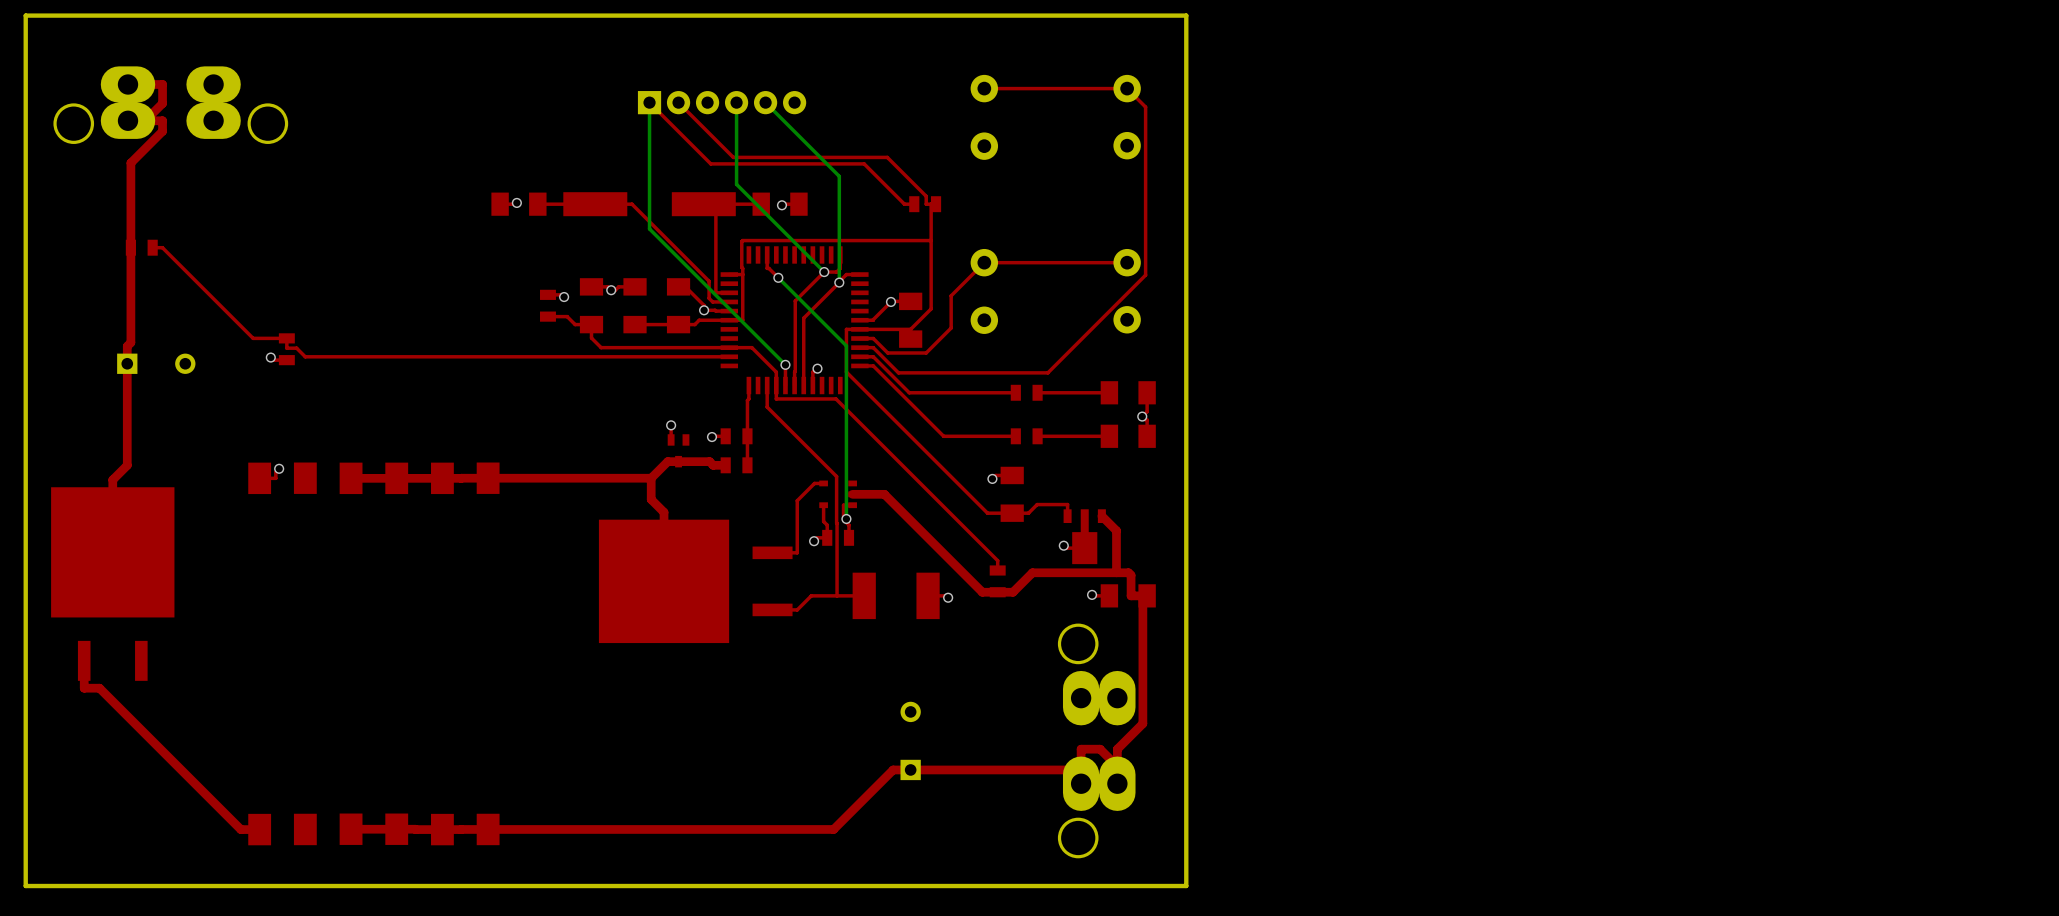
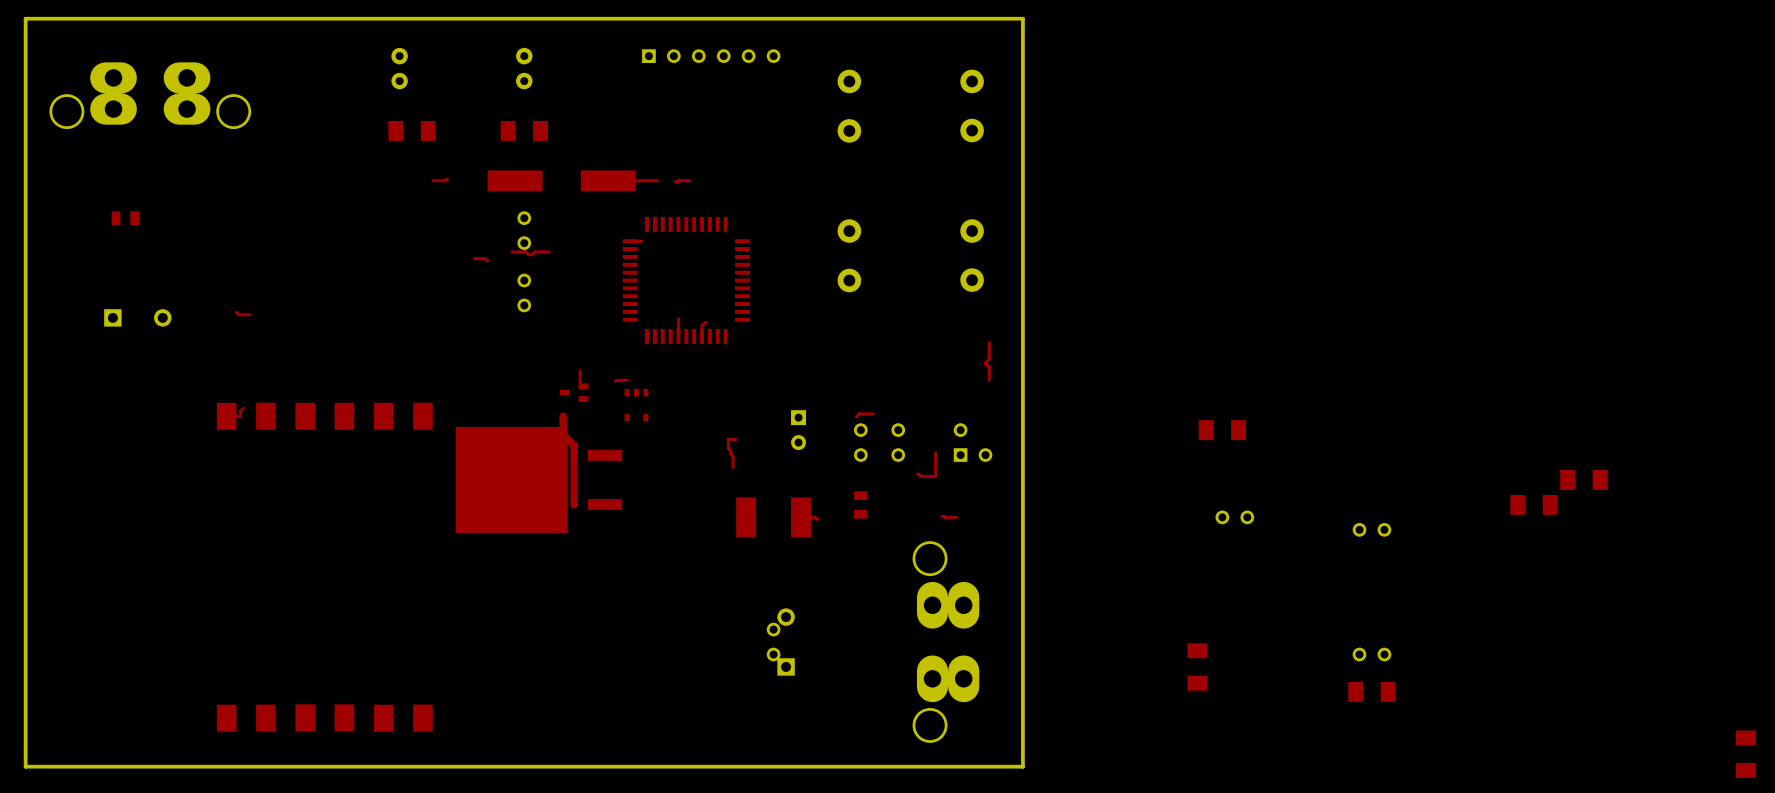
part: none -> (711, 56)
part: none -> (399, 68)
part: none -> (524, 68)
top track: (128, 84) (162, 84) (162, 103) (145, 120) -> none
top track: (984, 88) (1127, 88) (1145, 107) (1145, 275) (1047, 372) (898, 372) (873, 347) (859, 347) -> none
top track: (649, 102) (710, 163) (864, 163) (904, 204) (914, 204) -> none
bottom track: (649, 102) (649, 228) (785, 364) -> none
top track: (678, 102) (733, 157) (887, 157) (926, 196) (926, 204) (936, 204) -> none
part: (722, 102) -> none
bottom track: (736, 102) (736, 184) (824, 272) -> none
bottom track: (765, 102) (839, 176) (839, 282) -> none
top track: (128, 120) (162, 120) (162, 131) (130, 162) (130, 342) (127, 346) (127, 465) (112, 479) (112, 552) -> none
part: none -> (412, 130)
part: none -> (524, 130)
via: (516, 202) -> none
part: (518, 204) -> none
top track: (537, 204) (632, 204) (709, 281) (709, 298) (712, 301) (729, 301) -> none
top track: (715, 204) (715, 292) (729, 292) -> none
part: (780, 204) -> none
part: (925, 204) -> none
top track: (931, 204) (931, 308) (910, 329) -> none
via: (781, 205) -> none
top track: (931, 240) (742, 240) (742, 320) (699, 320) (694, 324) (635, 324) -> none
top track: (152, 247) (162, 247) (253, 338) (286, 338) (286, 348) (296, 348) (305, 356) (729, 356) -> none
top track: (767, 254) (767, 268) (778, 277) -> none
top track: (840, 254) (840, 268) (836, 272) (824, 272) (795, 301) (794, 385) -> none
part: none -> (524, 230)
top track: (1127, 262) (984, 262) (951, 295) (951, 328) (926, 353) (887, 353) (873, 338) (859, 338) -> none
via: (824, 272) -> none
top track: (859, 274) (846, 274) (803, 318) (803, 385) -> none
bottom track: (778, 277) (846, 345) (846, 518) -> none
via: (778, 277) -> none
via: (839, 282) -> none
top track: (678, 286) (685, 286) (704, 305) (704, 310) (729, 311) -> none
via: (611, 290) -> none
via: (564, 297) -> none
via: (890, 301) -> none
top track: (910, 301) (890, 301) (873, 320) (859, 320) -> none
part: (547, 305) -> none
part: (591, 305) -> none
part: (635, 305) -> none
part: (678, 305) -> none
via: (704, 310) -> none
top track: (547, 316) (567, 316) (575, 324) (591, 324) (591, 338) (601, 347) (751, 347) (776, 372) (776, 398) (835, 398) (997, 560) (997, 570) -> none
part: (910, 320) -> none
top track: (910, 329) (846, 329) (846, 372) (987, 513) (1028, 513) (1037, 504) (1067, 504) (1067, 516) -> none
part: none -> (524, 292)
part: (286, 349) -> none
top track: (859, 356) (873, 356) (909, 392) (1015, 392) -> none
via: (270, 357) -> none
via: (785, 364) -> none
top track: (859, 365) (873, 365) (943, 436) (1015, 436) -> none
via: (817, 368) -> none
top track: (748, 385) (747, 465) -> none
top track: (767, 385) (767, 407) (836, 476) (837, 595) -> none
part: (1026, 392) -> none
top track: (1109, 392) (1037, 392) -> none
part: (1128, 392) -> none
via: (1142, 416) -> none
via: (671, 425) -> none
part: (736, 436) -> none
part: (1026, 436) -> none
top track: (1109, 436) (1037, 436) -> none
part: (1128, 436) -> none
via: (711, 437) -> none
part rotation: 0° (678, 450) -> 90° clockwise (574, 392)
part footprint: [720, 457, 753, 474] -> [624, 388, 649, 422]
top track: (725, 465) (713, 465) (709, 461) (667, 461) (651, 478) (461, 478) -> none
via: (279, 468) -> none
top track: (461, 478) (351, 478) -> none
via: (992, 478) -> none
top track: (823, 483) (814, 483) (797, 500) (797, 552) (772, 552) -> none
part: (838, 494) -> none
top track: (852, 494) (884, 494) (982, 592) (1013, 592) (1032, 572) (1128, 572) (1131, 575) (1131, 595) (1147, 595) -> none
part: none -> (798, 430)
part: (1012, 494) -> none
part: none -> (1222, 430)
top track: (823, 505) (823, 521) (827, 525) (827, 537) (817, 537) (814, 541) -> none
part: none -> (860, 442)
part: none -> (898, 442)
part: none -> (973, 442)
top track: (1101, 516) (1116, 530) (1116, 572) -> none
via: (846, 518) -> none
part: (1084, 536) -> none
part: (838, 537) -> none
via: (814, 541) -> none
via: (1063, 545) -> none
part: none -> (1583, 479)
part position: (695, 581) -> (539, 479)
part: none -> (1534, 504)
part: (112, 584) -> none
via: (1092, 594) -> none
top track: (864, 595) (811, 595) (797, 609) (772, 609) -> none
part: (1128, 595) -> none
top track: (1142, 595) (1142, 723) (1117, 749) (1117, 783) -> none
part: none -> (1234, 517)
via: (948, 597) -> none
part: none -> (1371, 529)
top track: (84, 660) (84, 688) (99, 688) (240, 829) (259, 829) -> none
part: none -> (773, 642)
part: none -> (1371, 654)
top track: (1117, 766) (1100, 749) (1081, 749) (1081, 783) -> none
top track: (1081, 769) (893, 769) (833, 829) (461, 829) -> none
part: none -> (1197, 666)
part: none -> (1371, 691)
top track: (351, 829) (461, 829) -> none
part: none -> (1745, 754)

